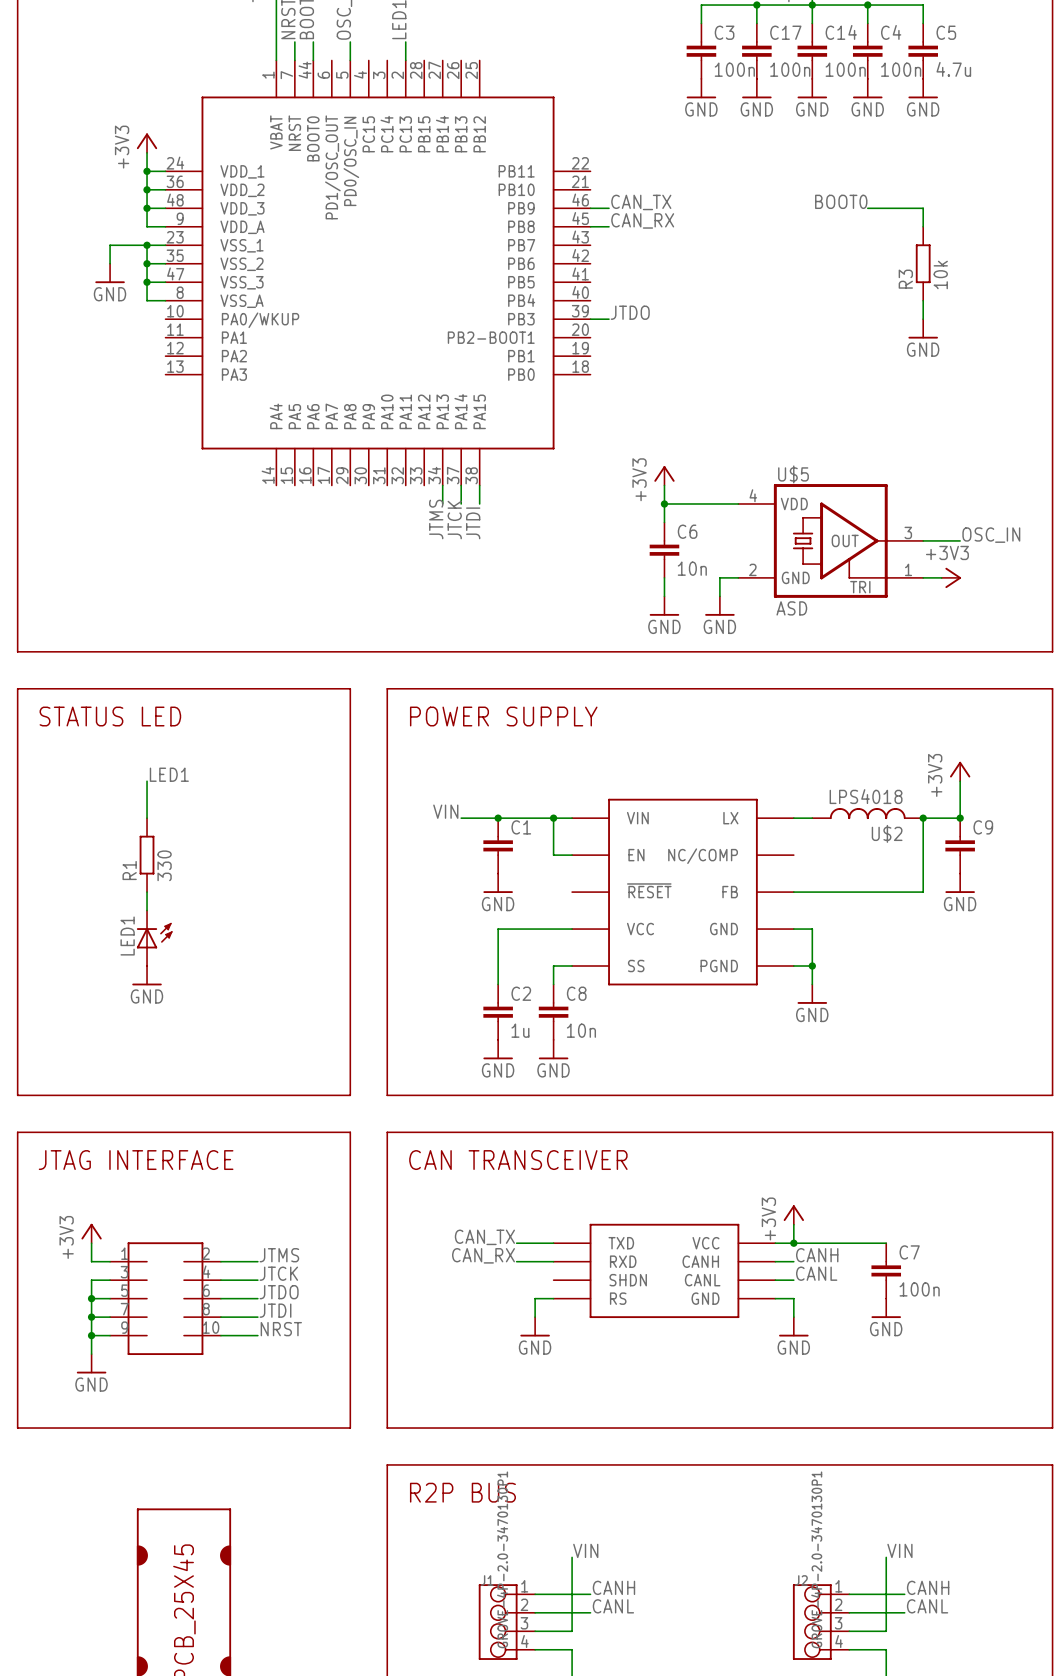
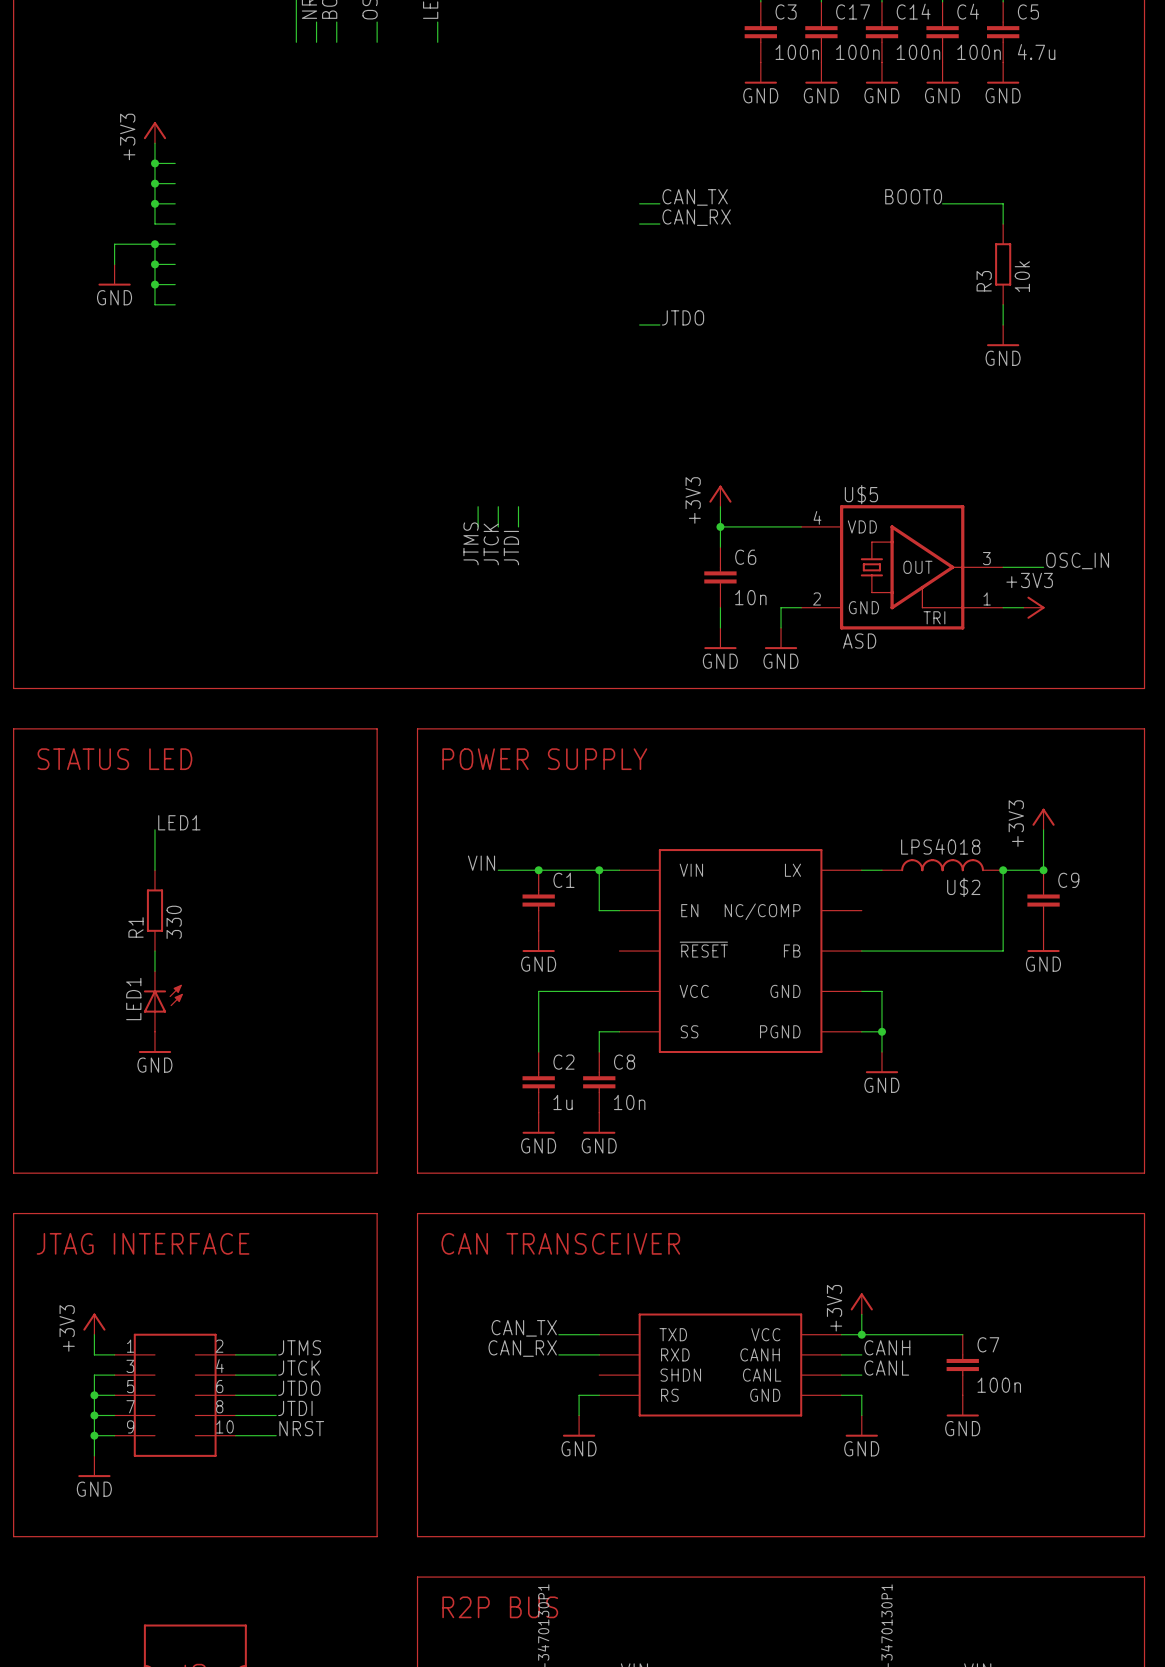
part: (378, 272) -> none

